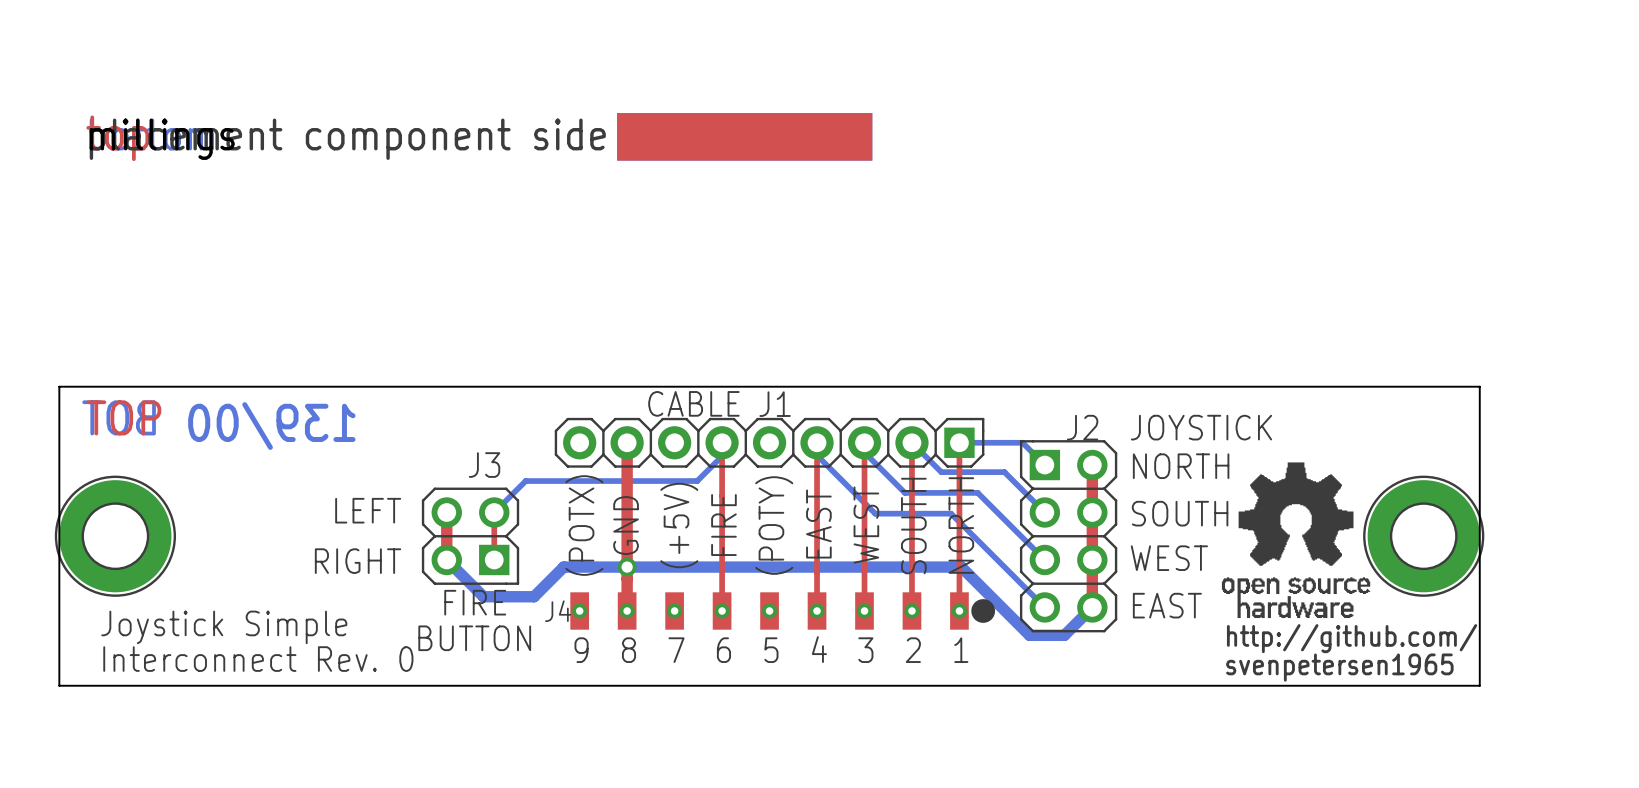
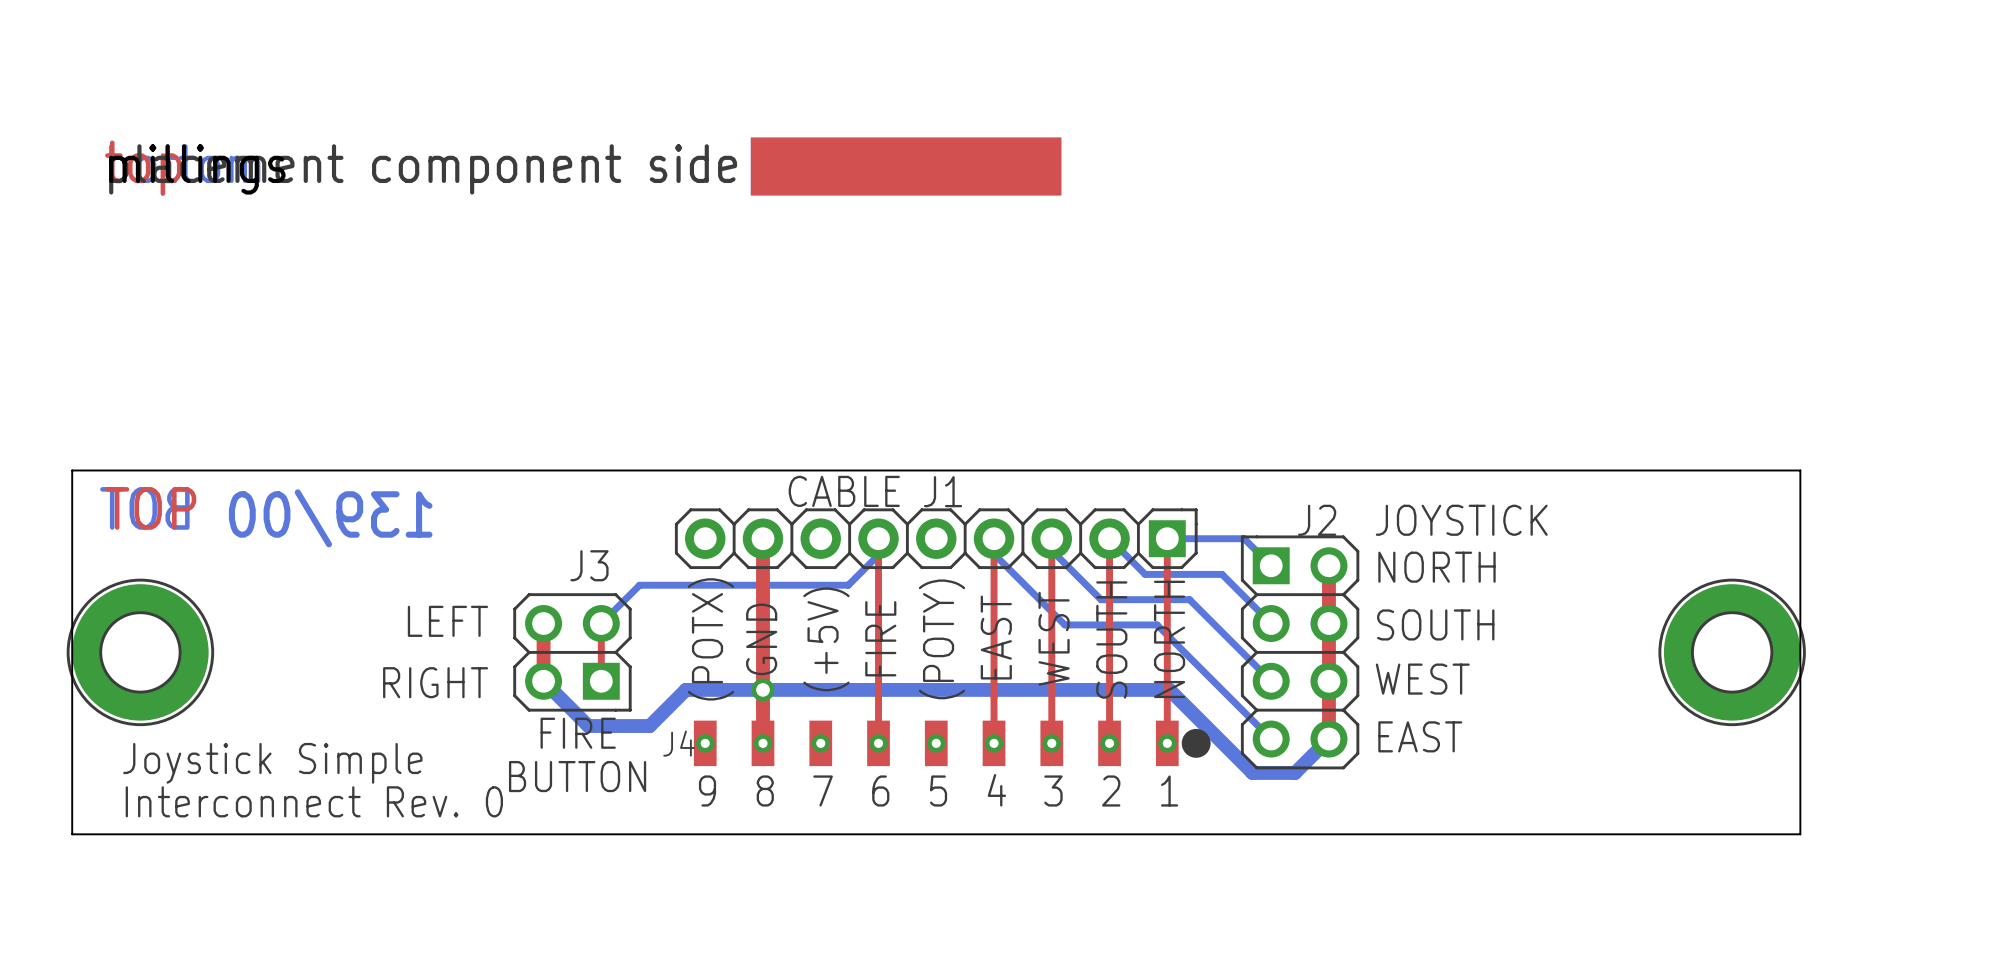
drawing: [1221, 462, 1371, 619] -> none
text: http://github.com/ (1352, 638) -> none
text: svenpetersen1965 (1339, 667) -> none

